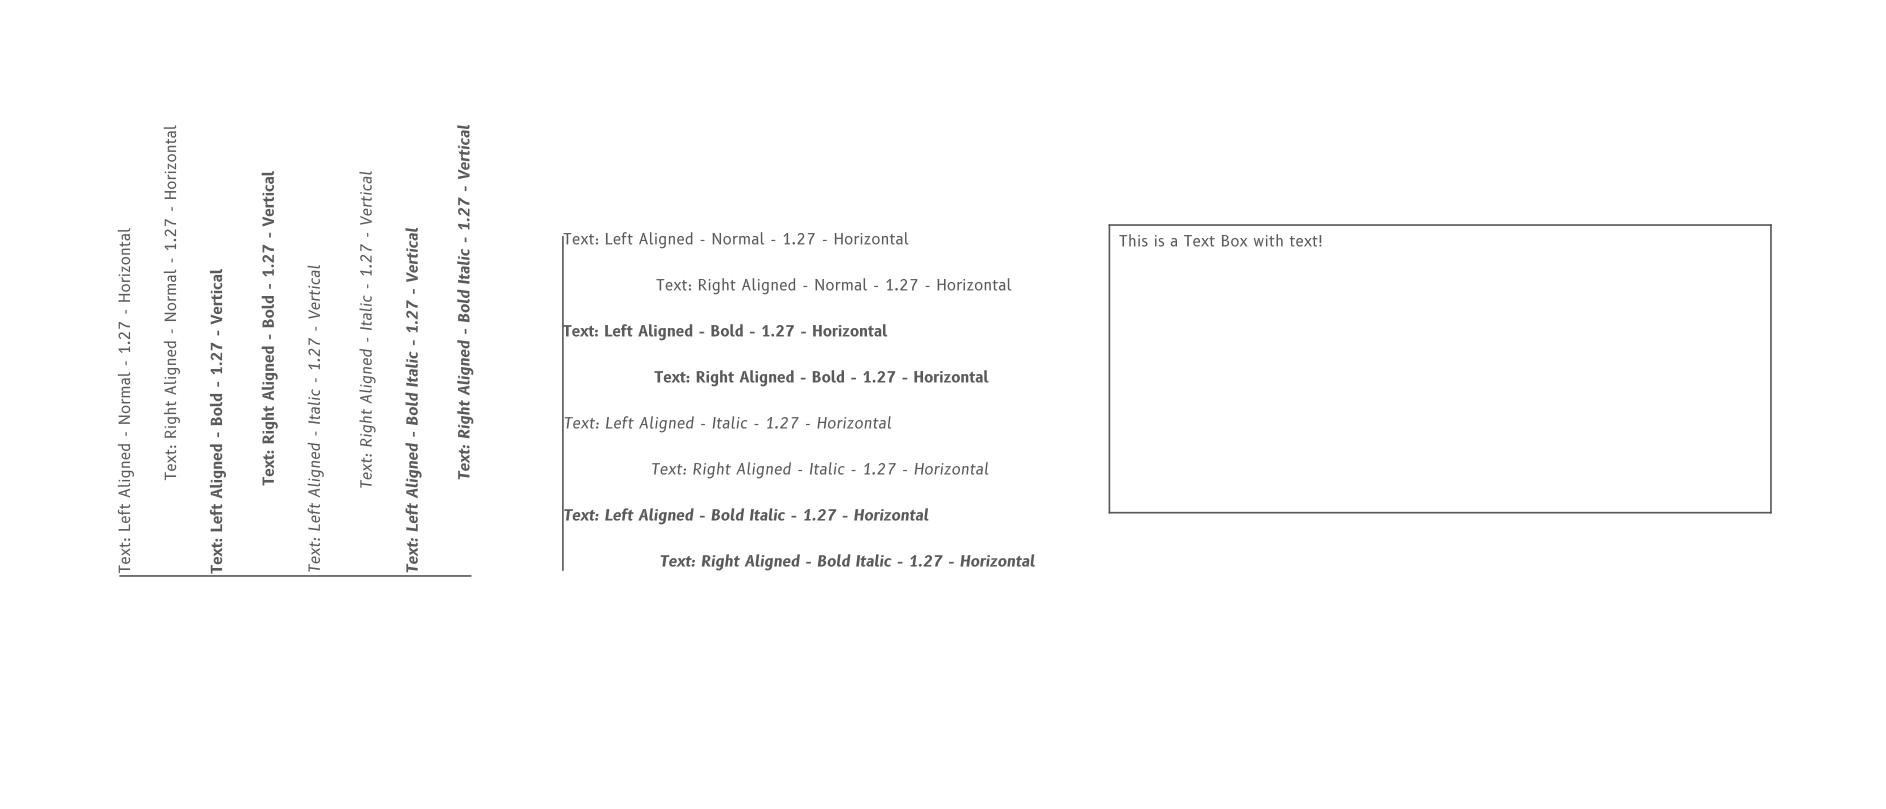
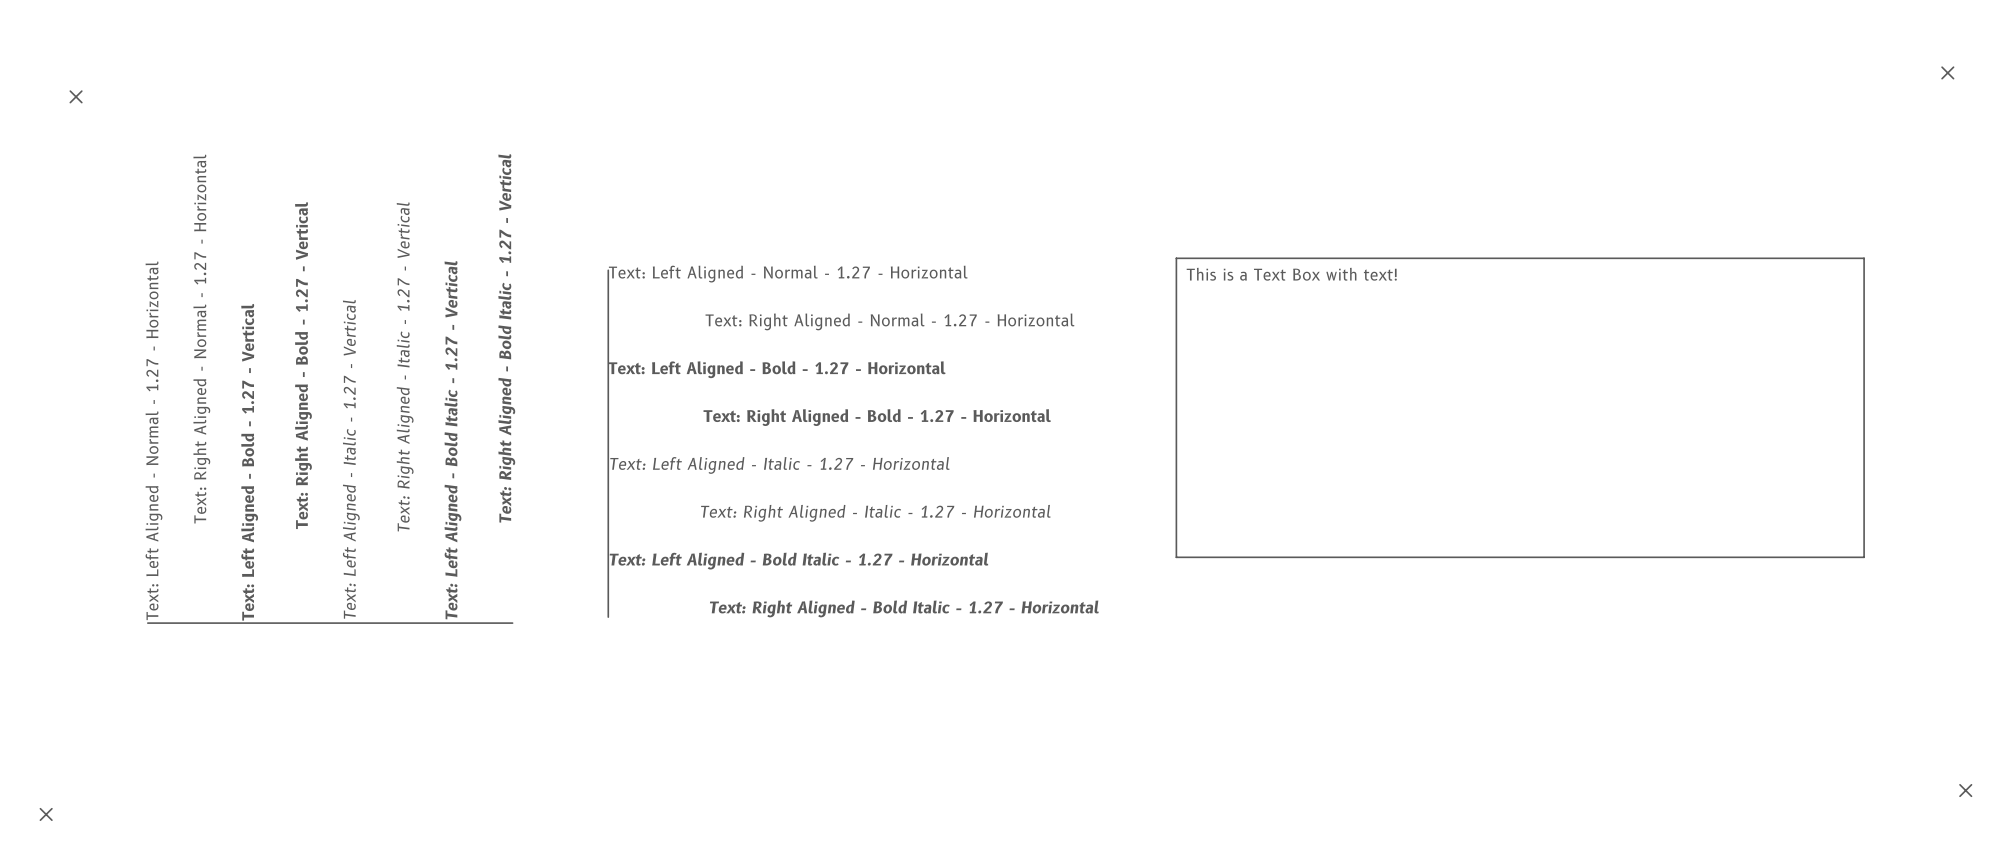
no-connect mark: none -> (1947, 72)
no-connect mark: none -> (76, 96)
no-connect mark: none -> (1965, 790)
no-connect mark: none -> (46, 814)

